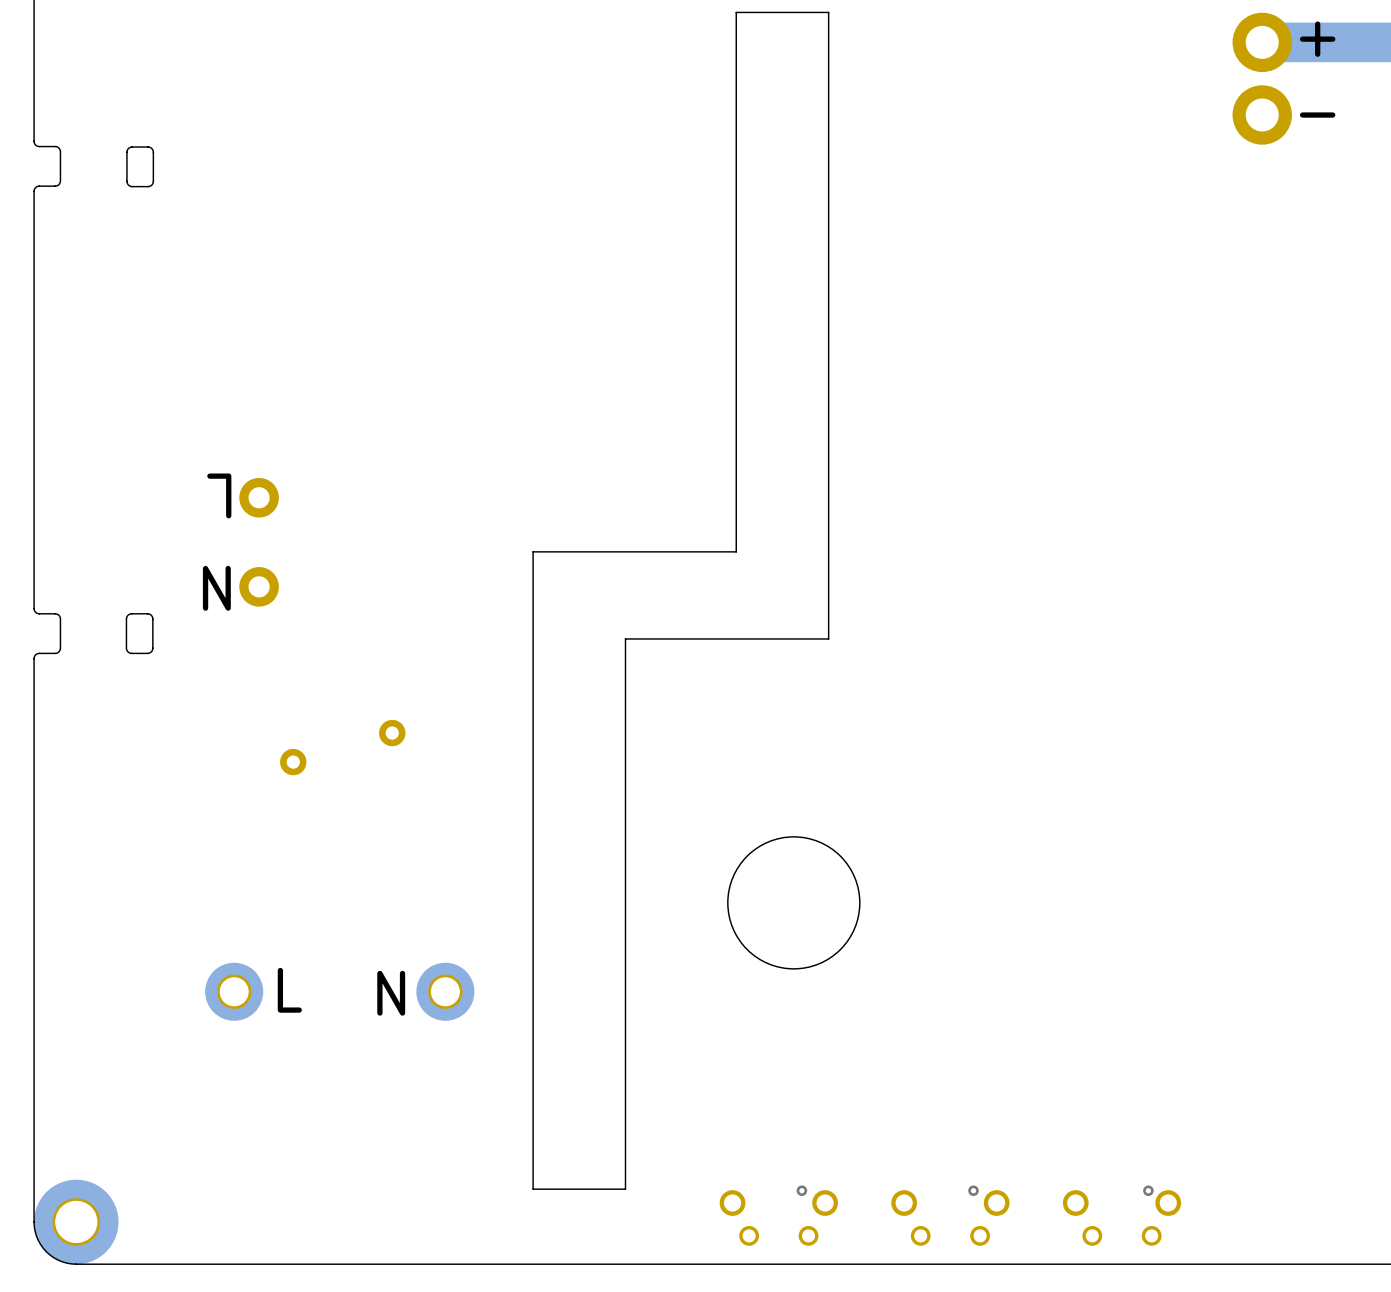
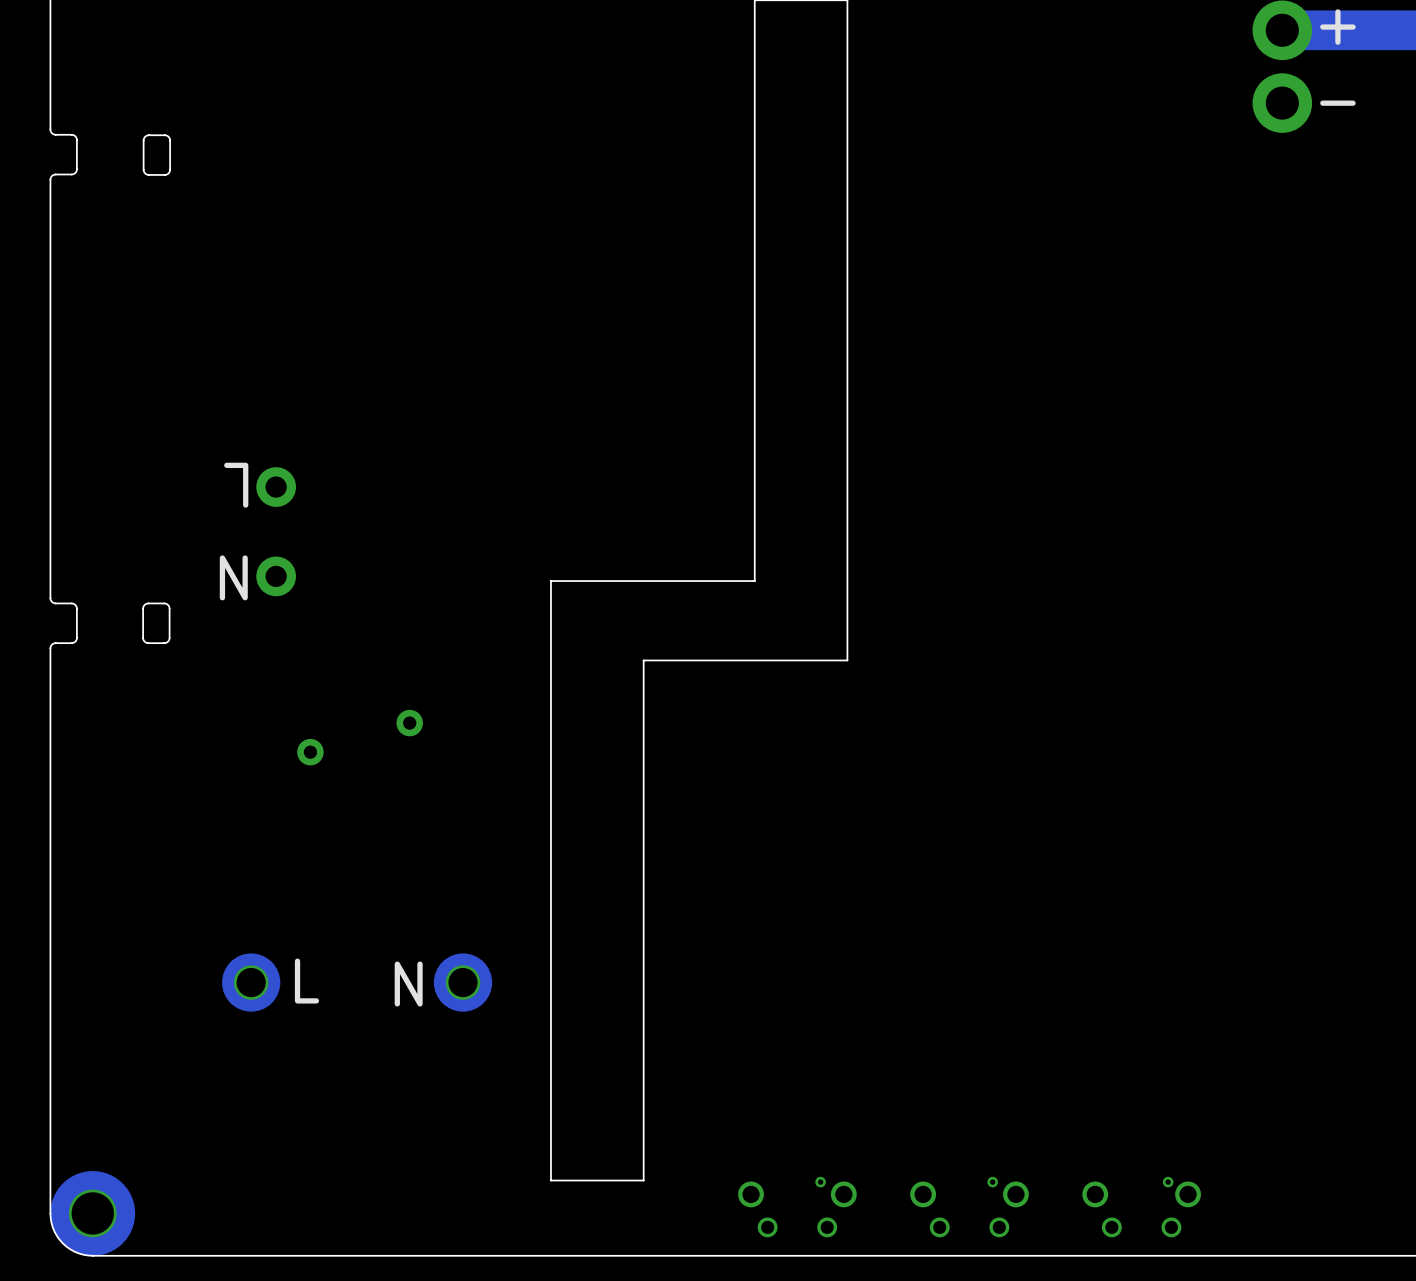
board edge: (736, 551) (533, 551) (533, 591) -> (754, 541) (754, 581) (550, 581)
board edge: (828, 638) (625, 638) (625, 670) -> (847, 628) (847, 660) (643, 660)
round board edge: [727, 836, 861, 970] -> none

